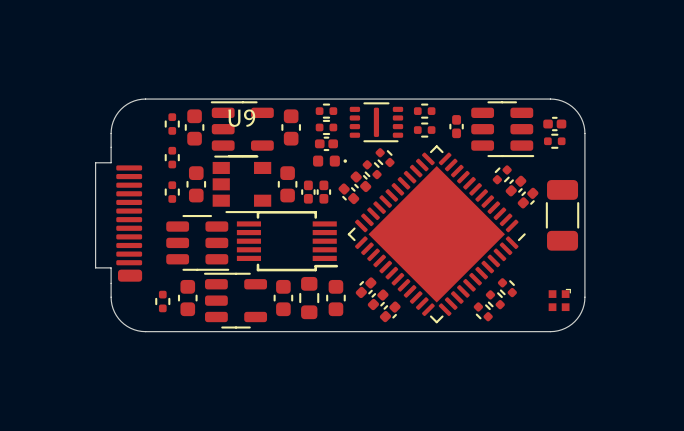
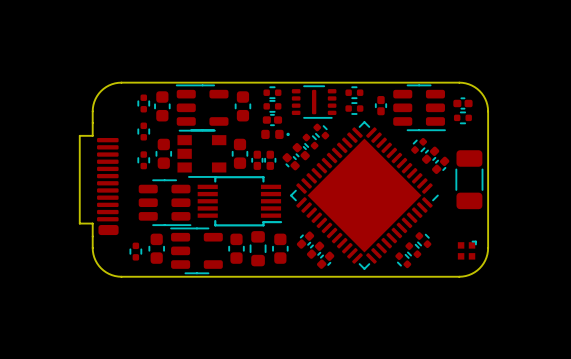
U9 name: U9 (241, 118) -> none

